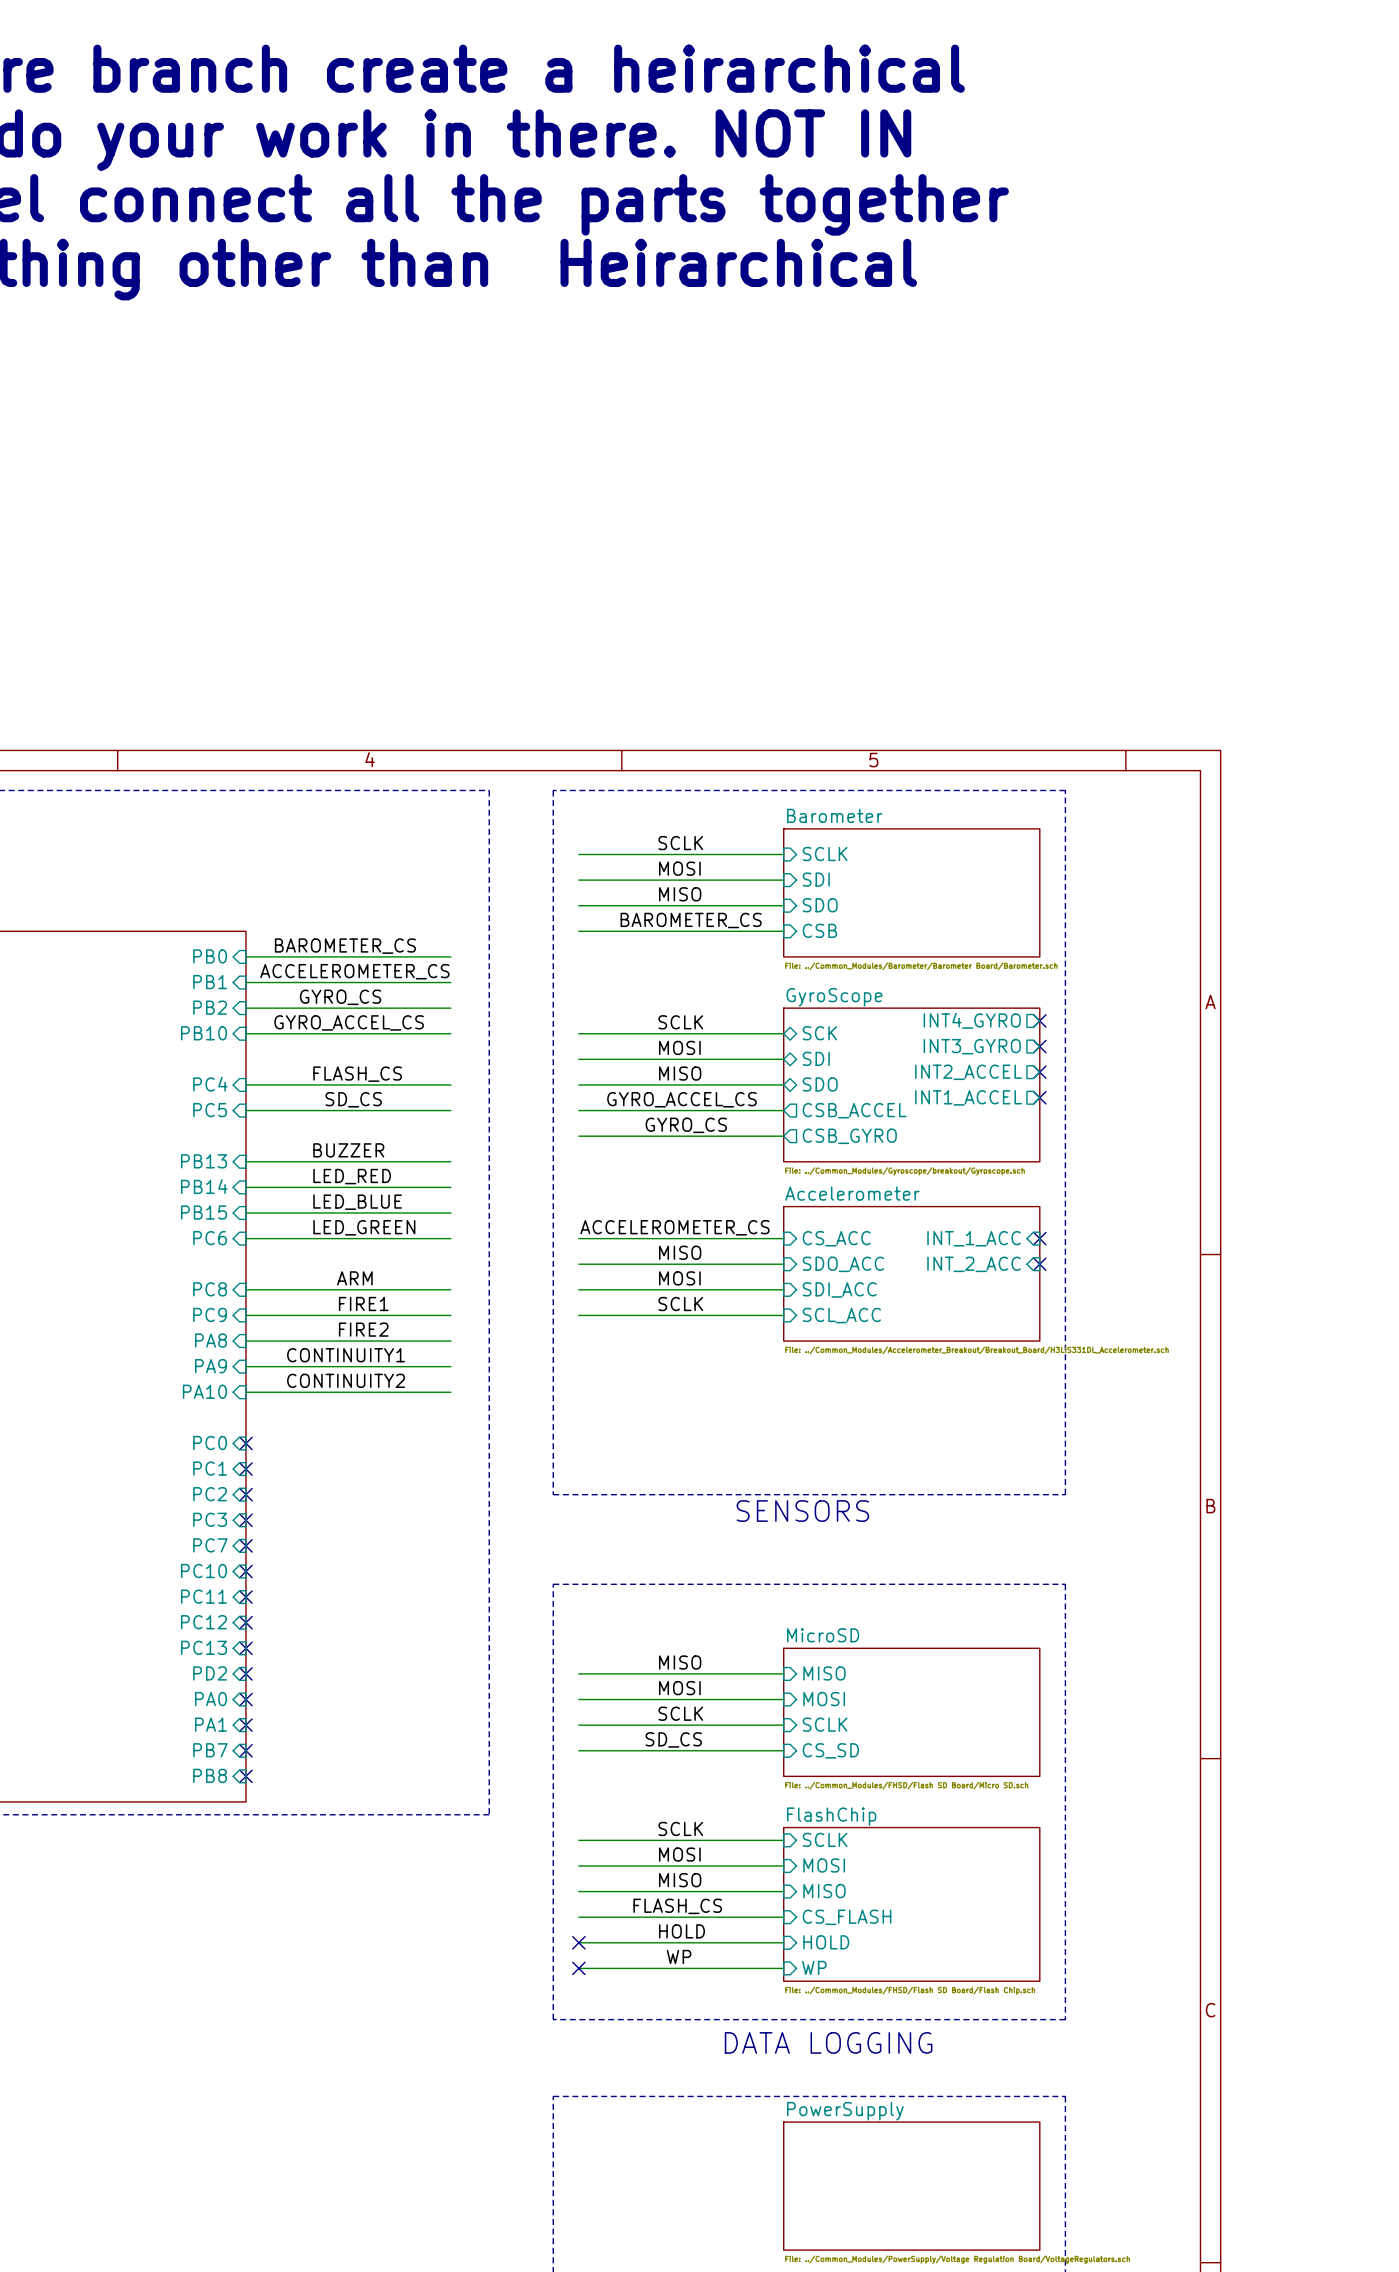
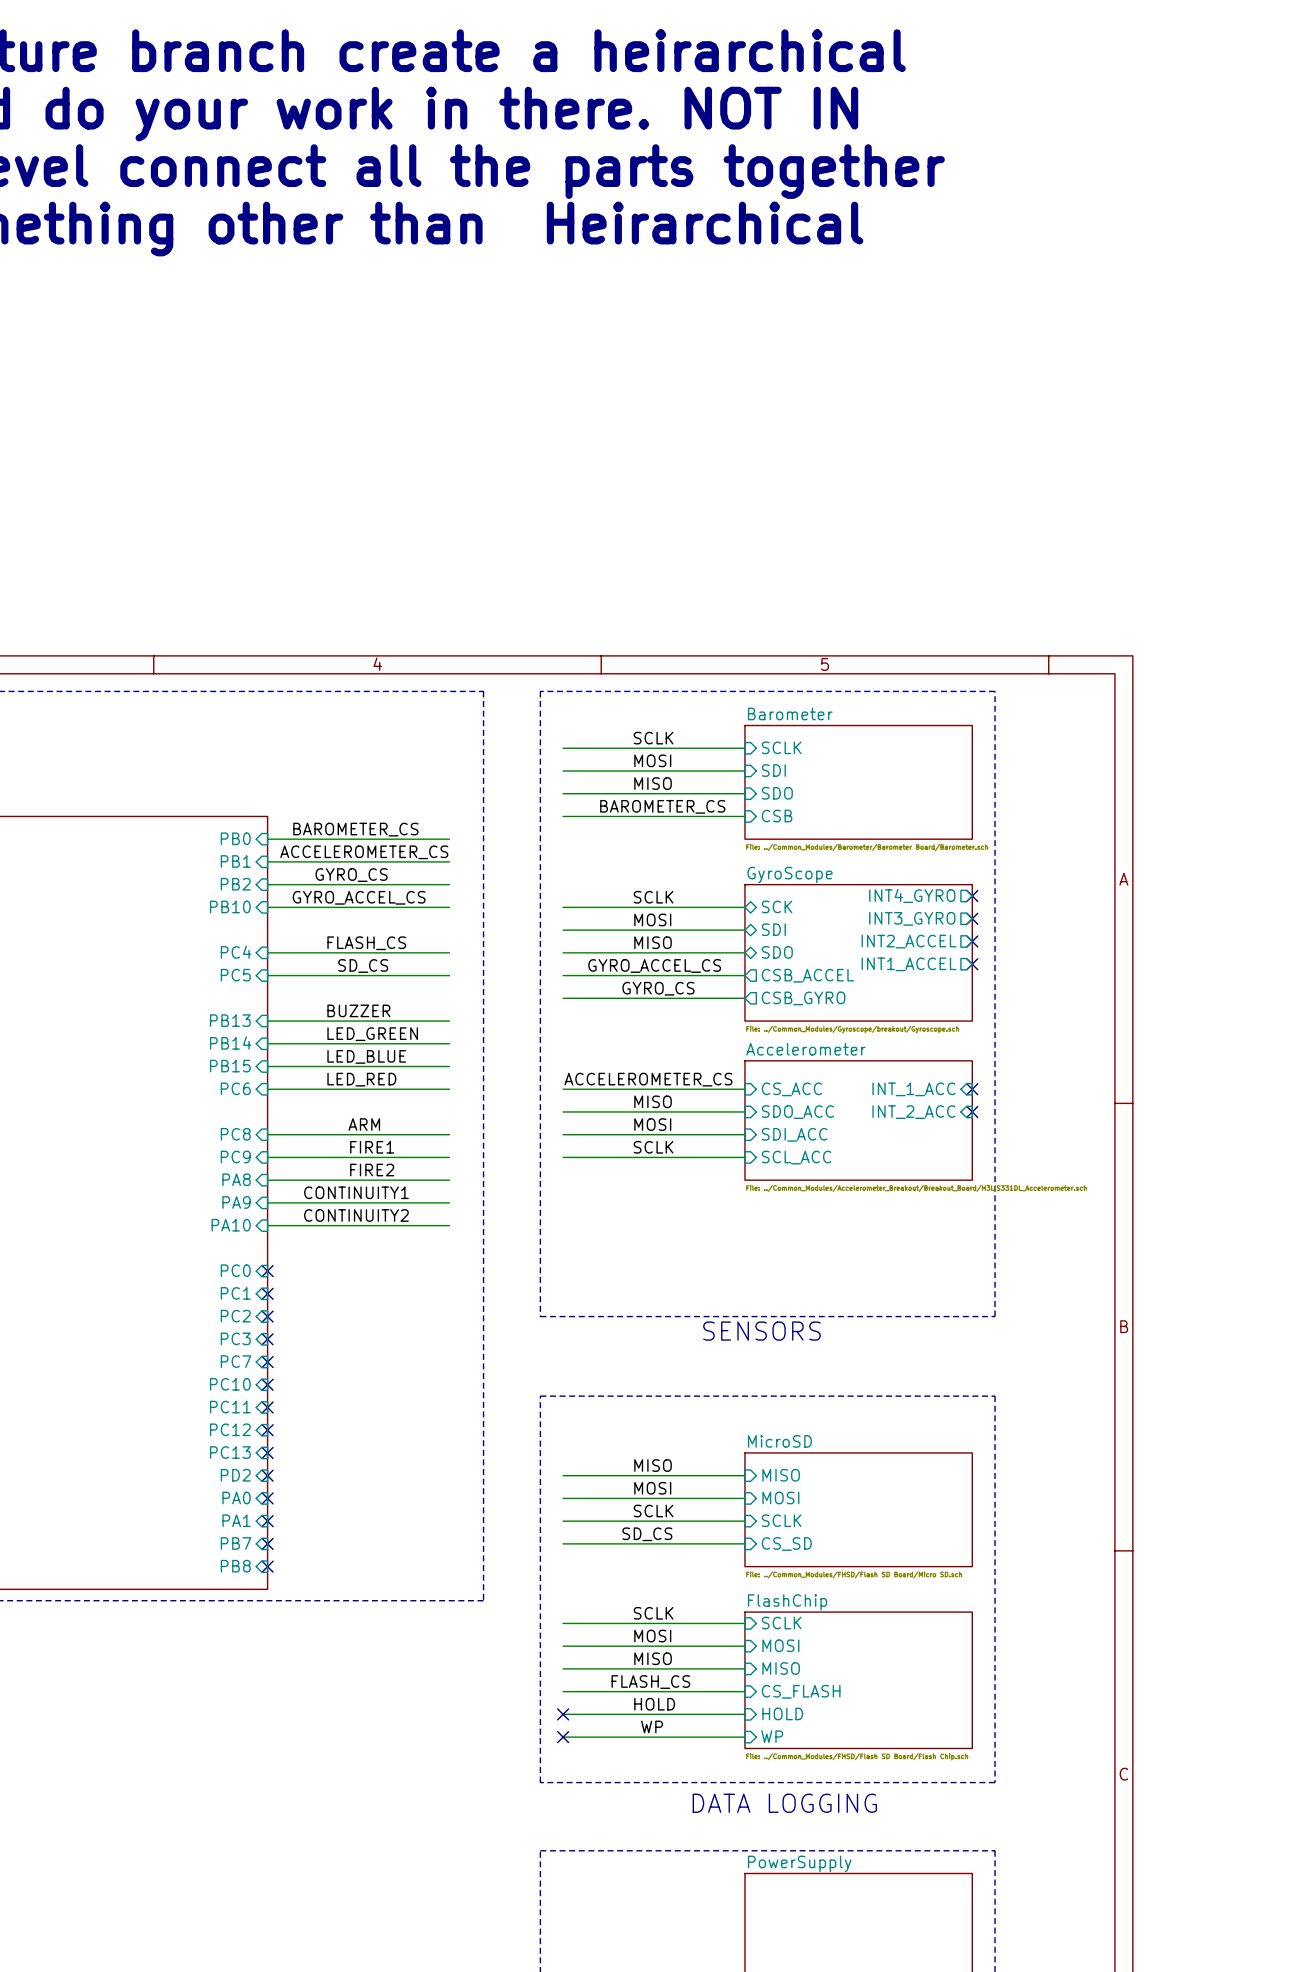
label: LED_RED (352, 1176) -> LED_GREEN (372, 1034)
label: LED_GREEN (364, 1227) -> LED_RED (361, 1079)

